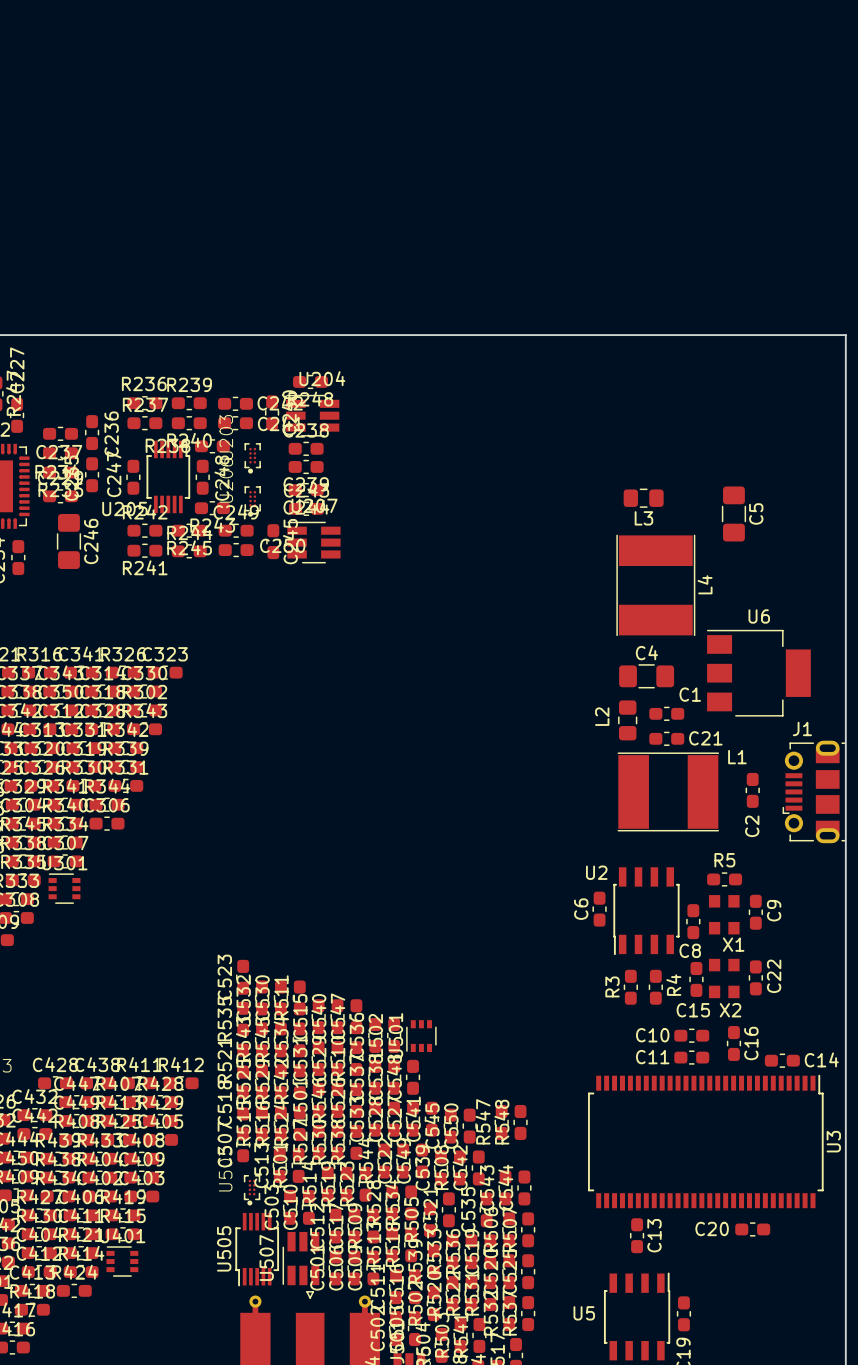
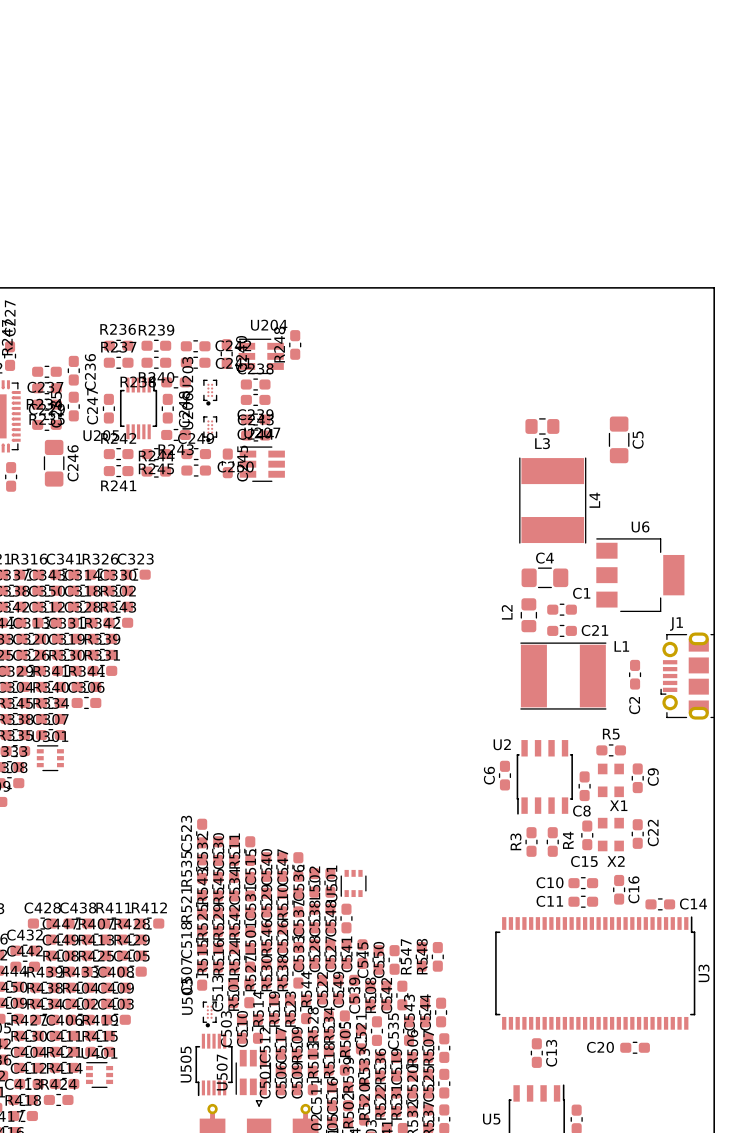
R248 rotation: 0° (310, 381) -> 90° clockwise (295, 344)
R248 position: (310, 381) -> (295, 344)

